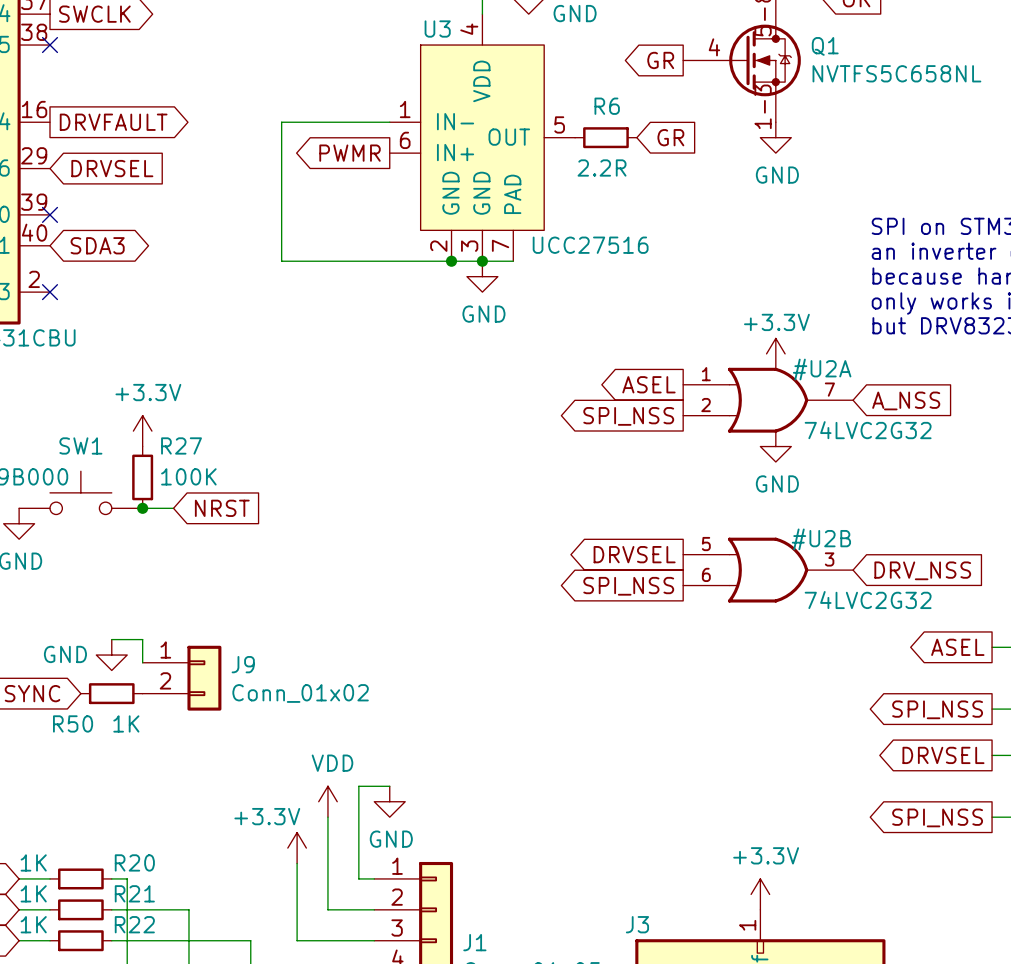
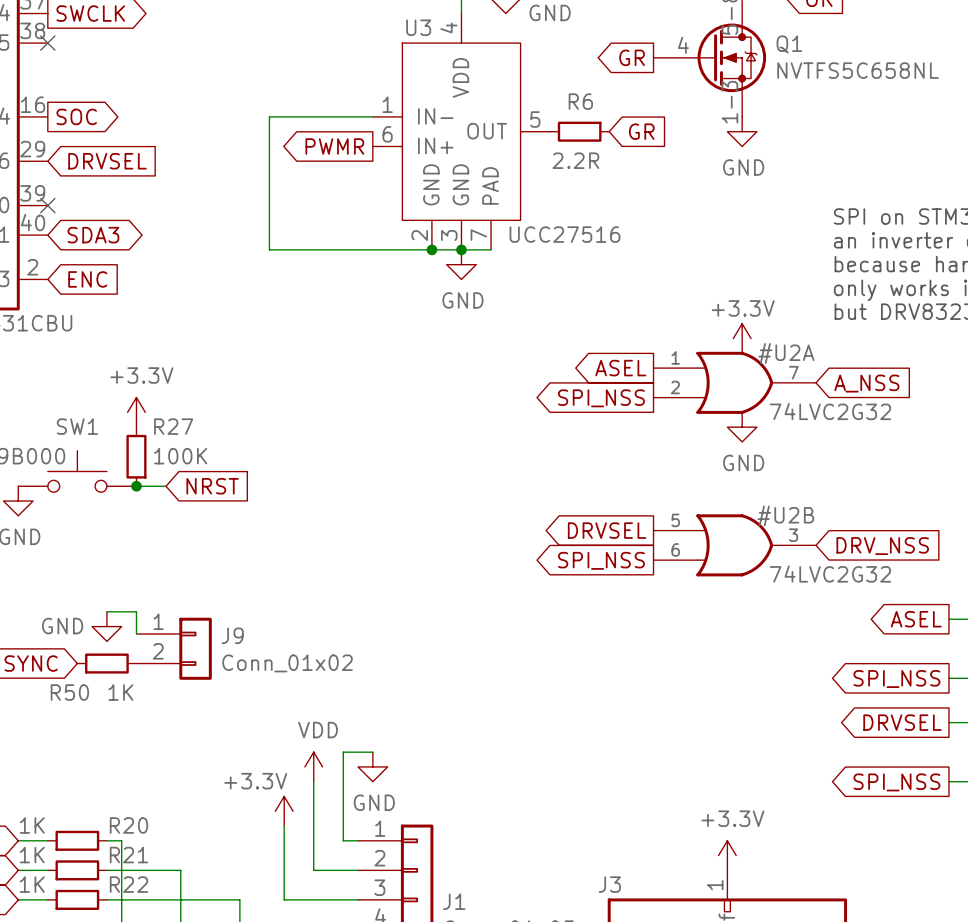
global label: DRVFAULT (113, 122) -> SOC (76, 116)
no-connect mark: (50, 292) -> none
global label: none -> ENC (87, 279)

